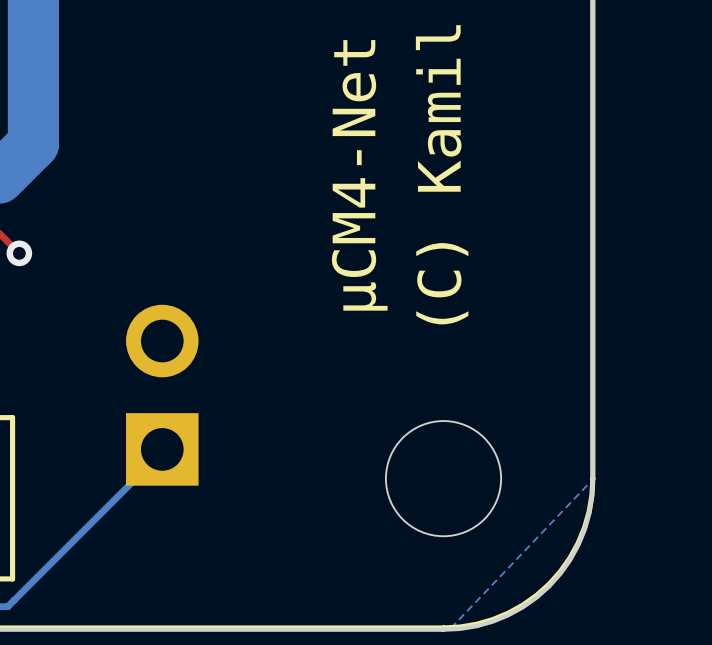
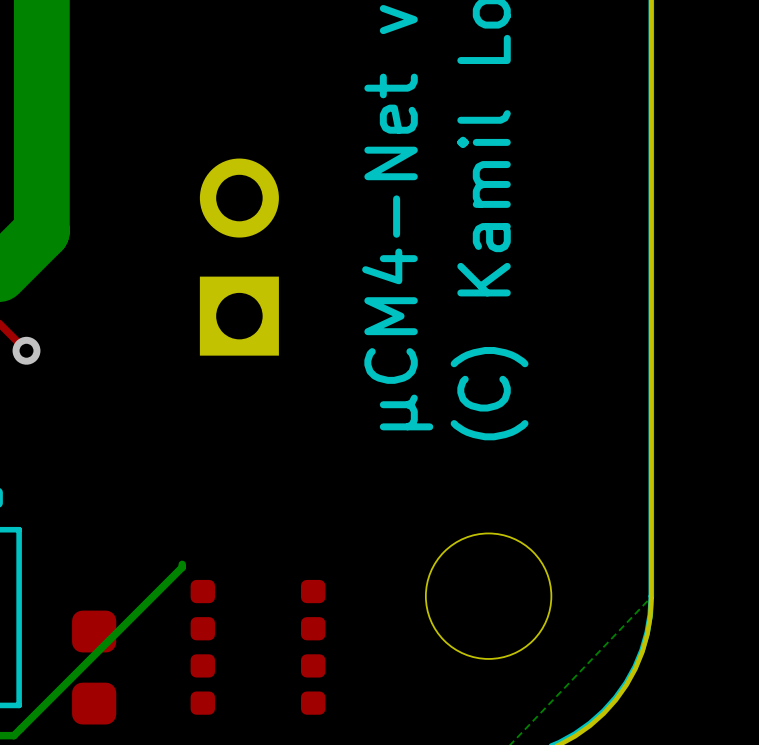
part position: (162, 395) -> (239, 257)
part: none -> (258, 647)
part: none -> (94, 667)

